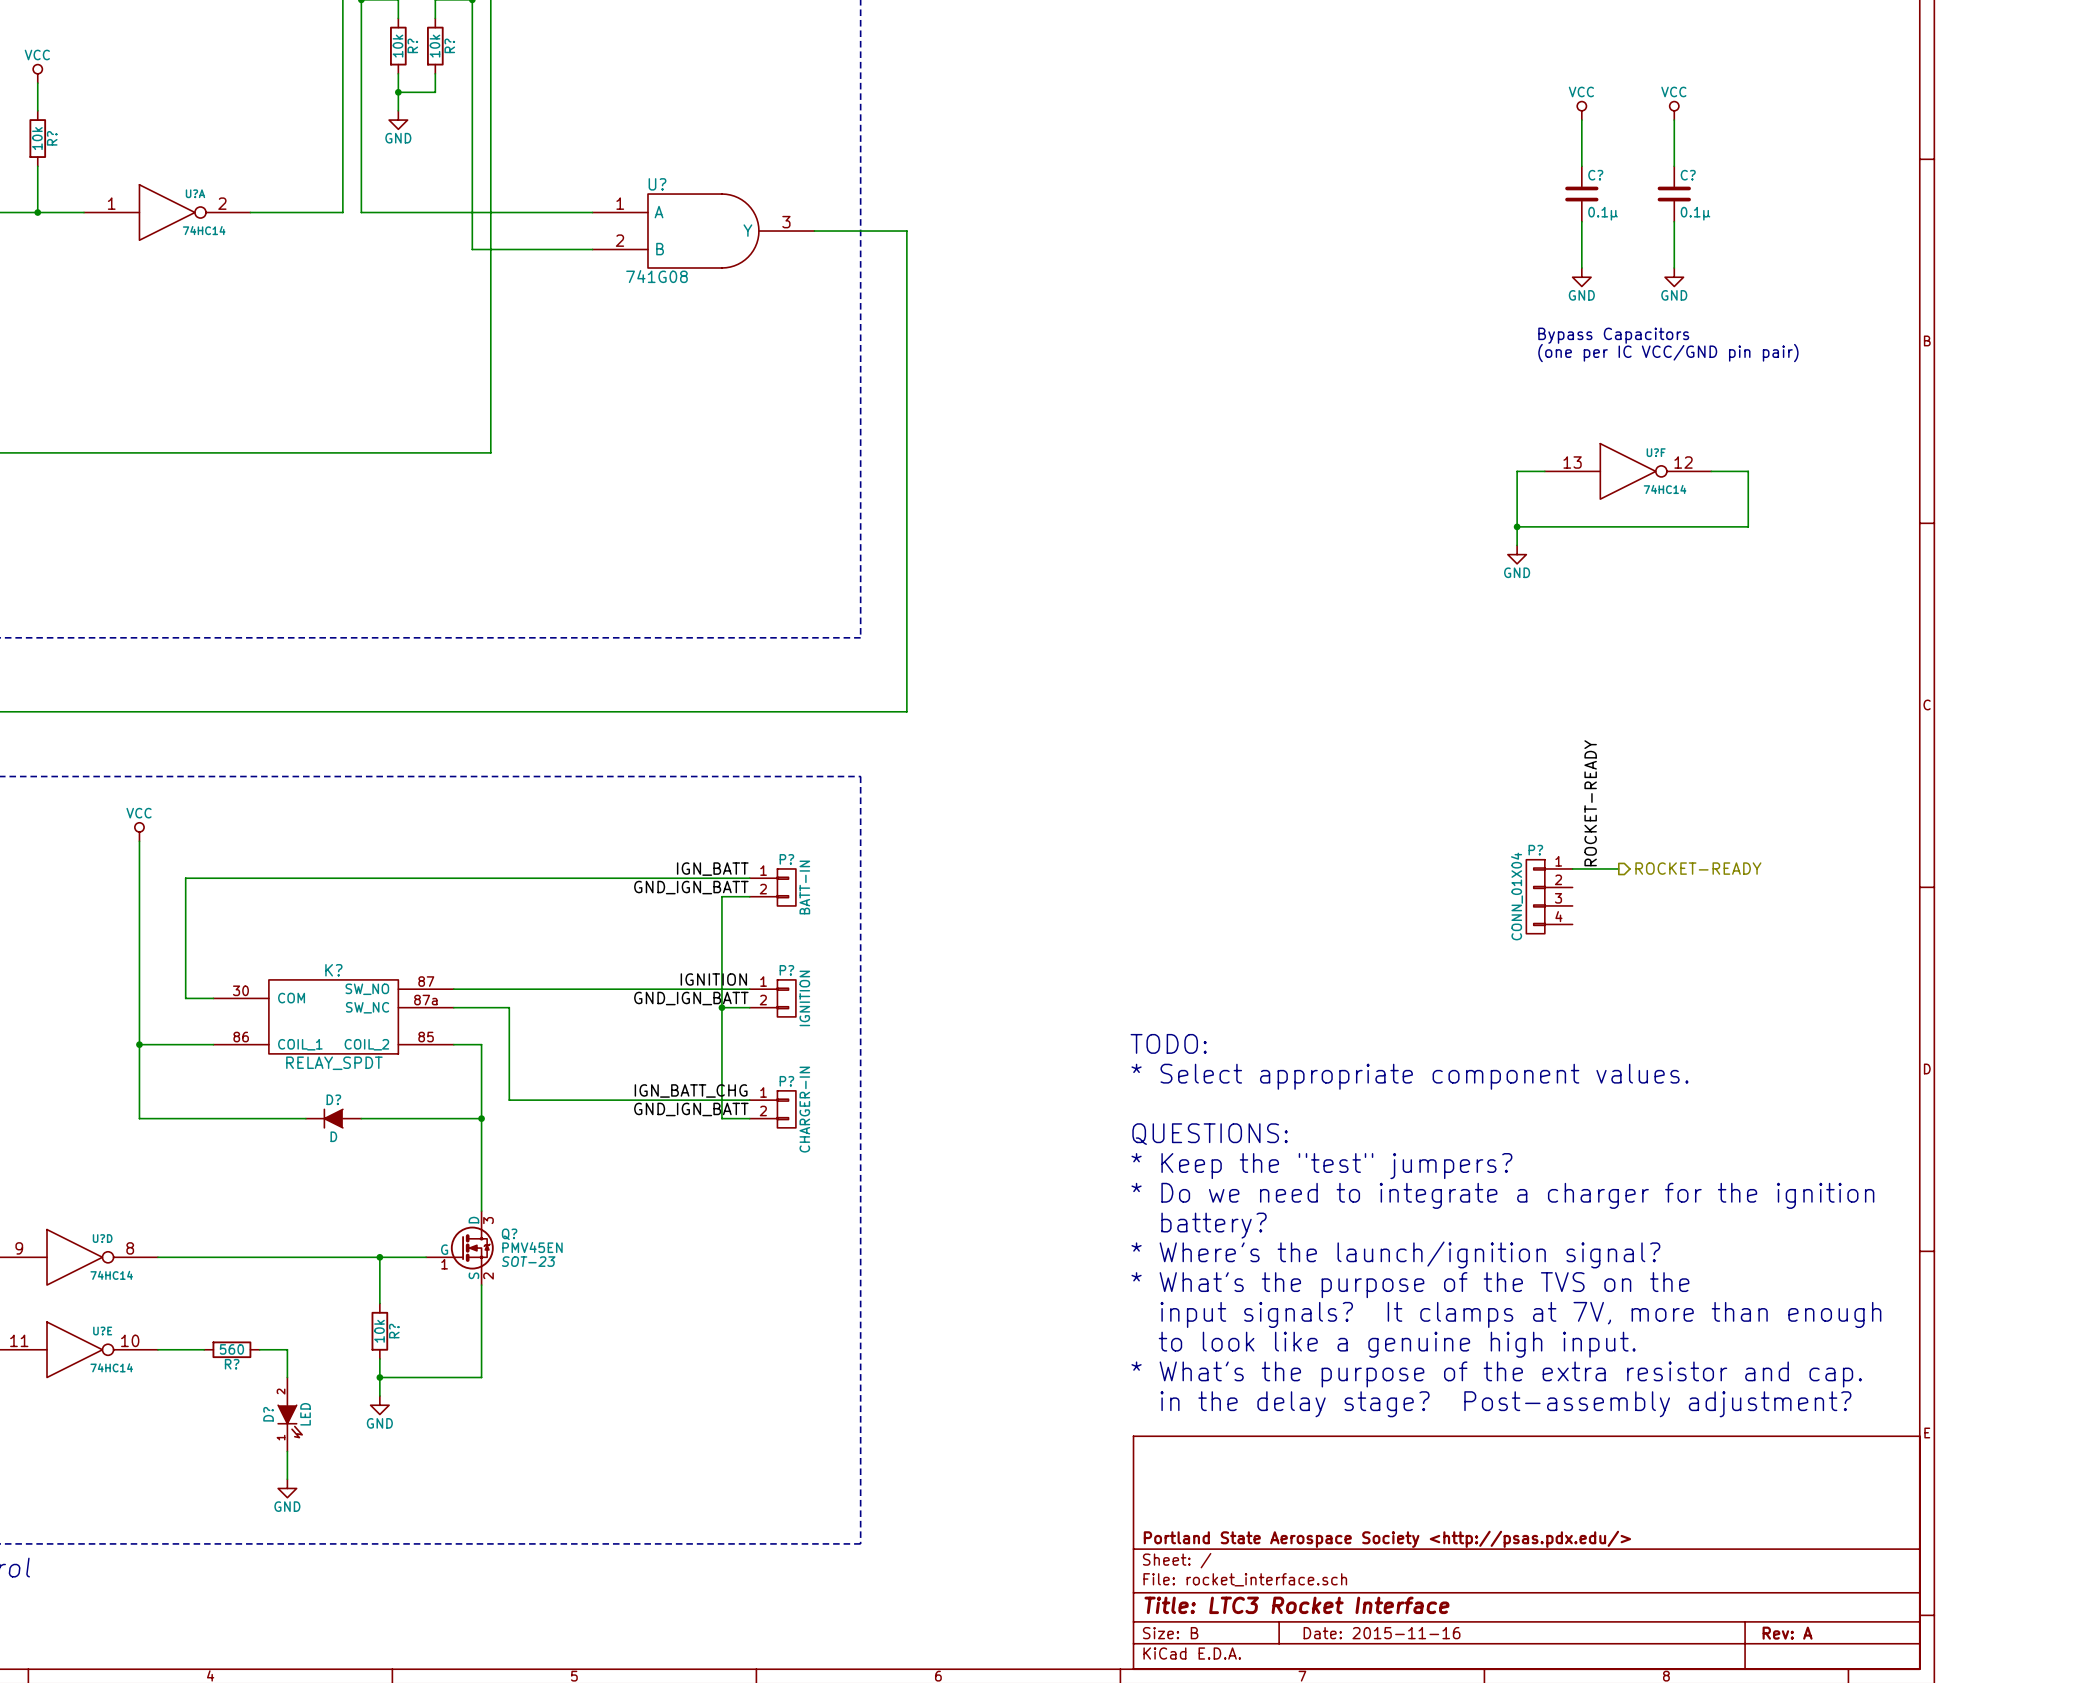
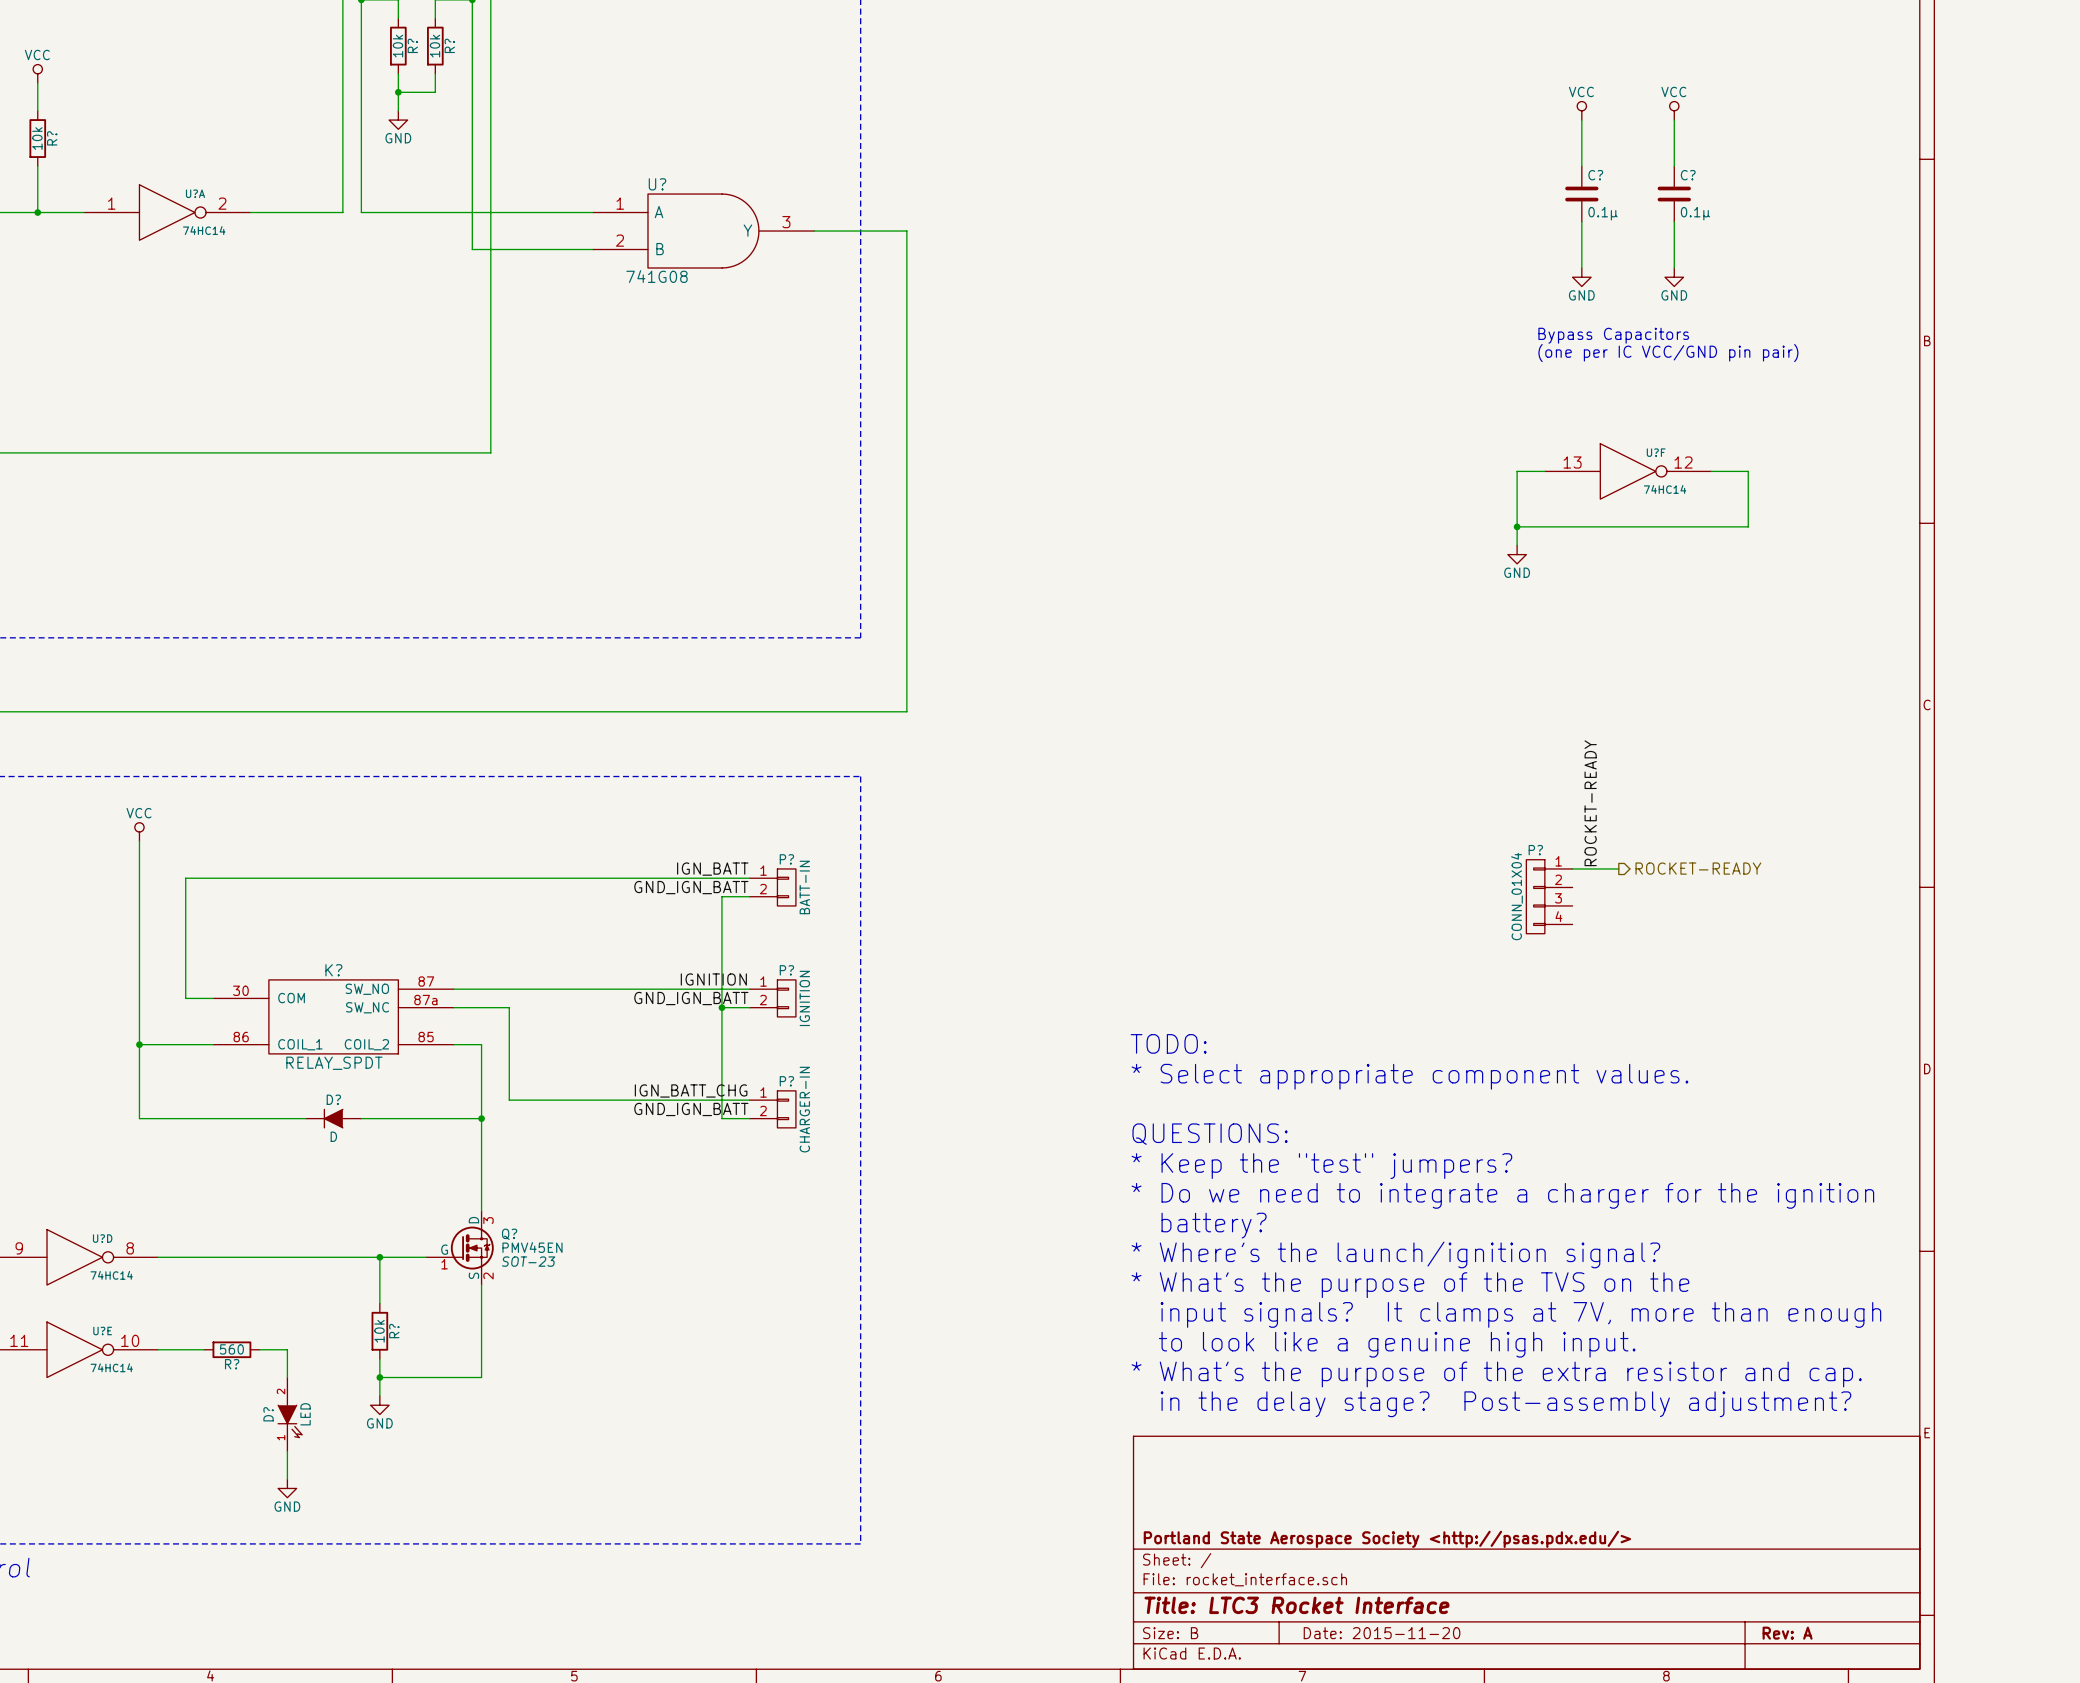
title block: Date: 2015-11-16 (1382, 1633) -> Date: 2015-11-20 (1382, 1633)

